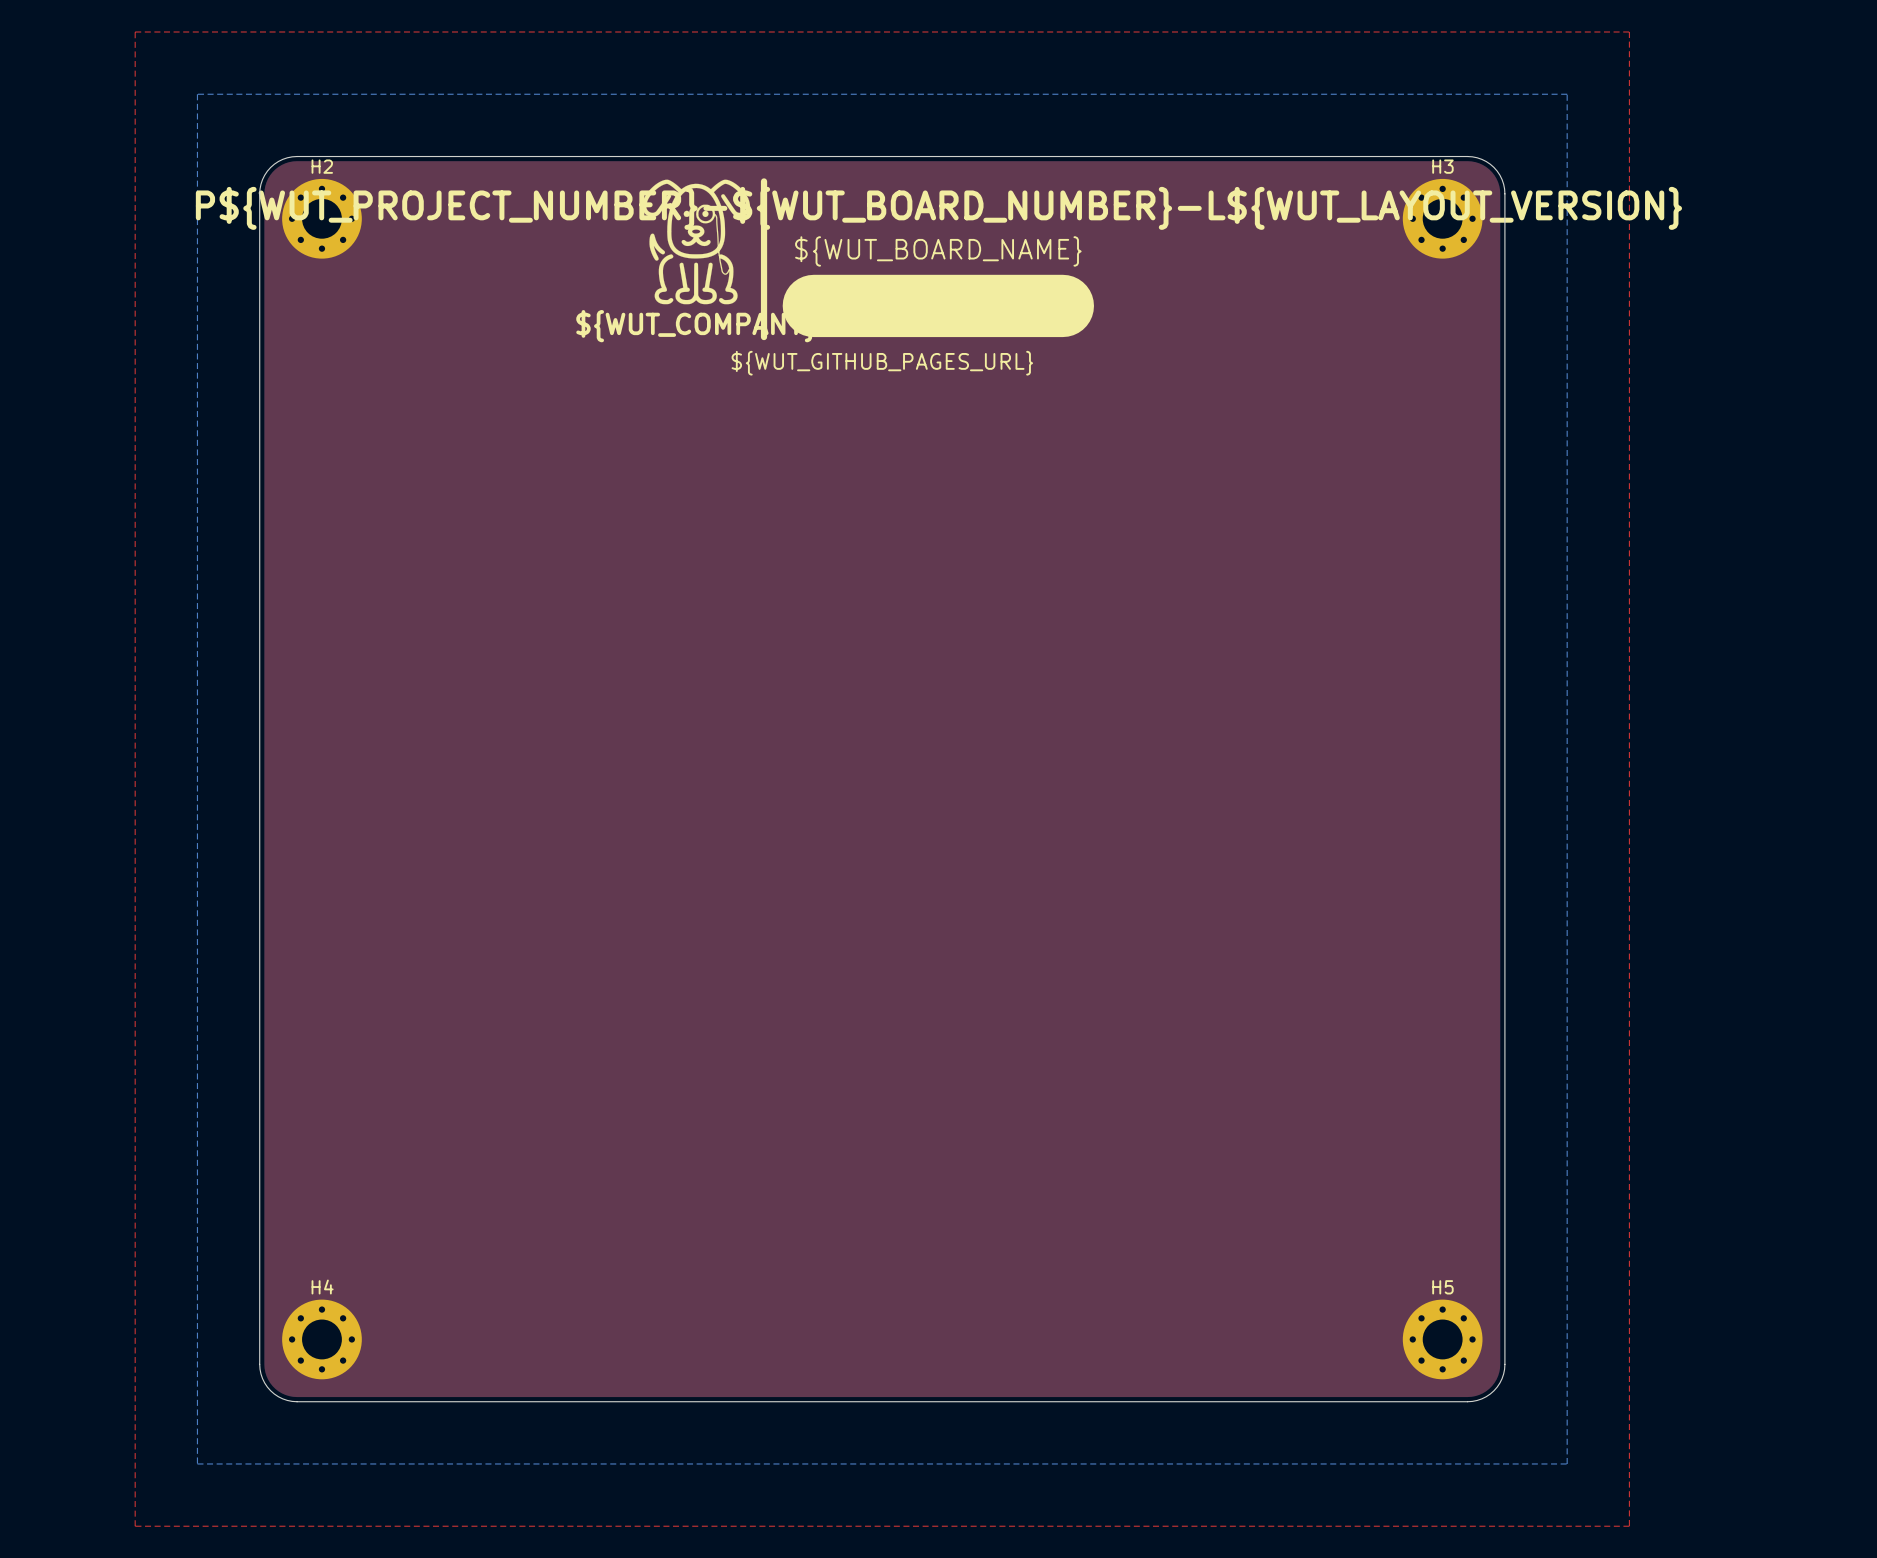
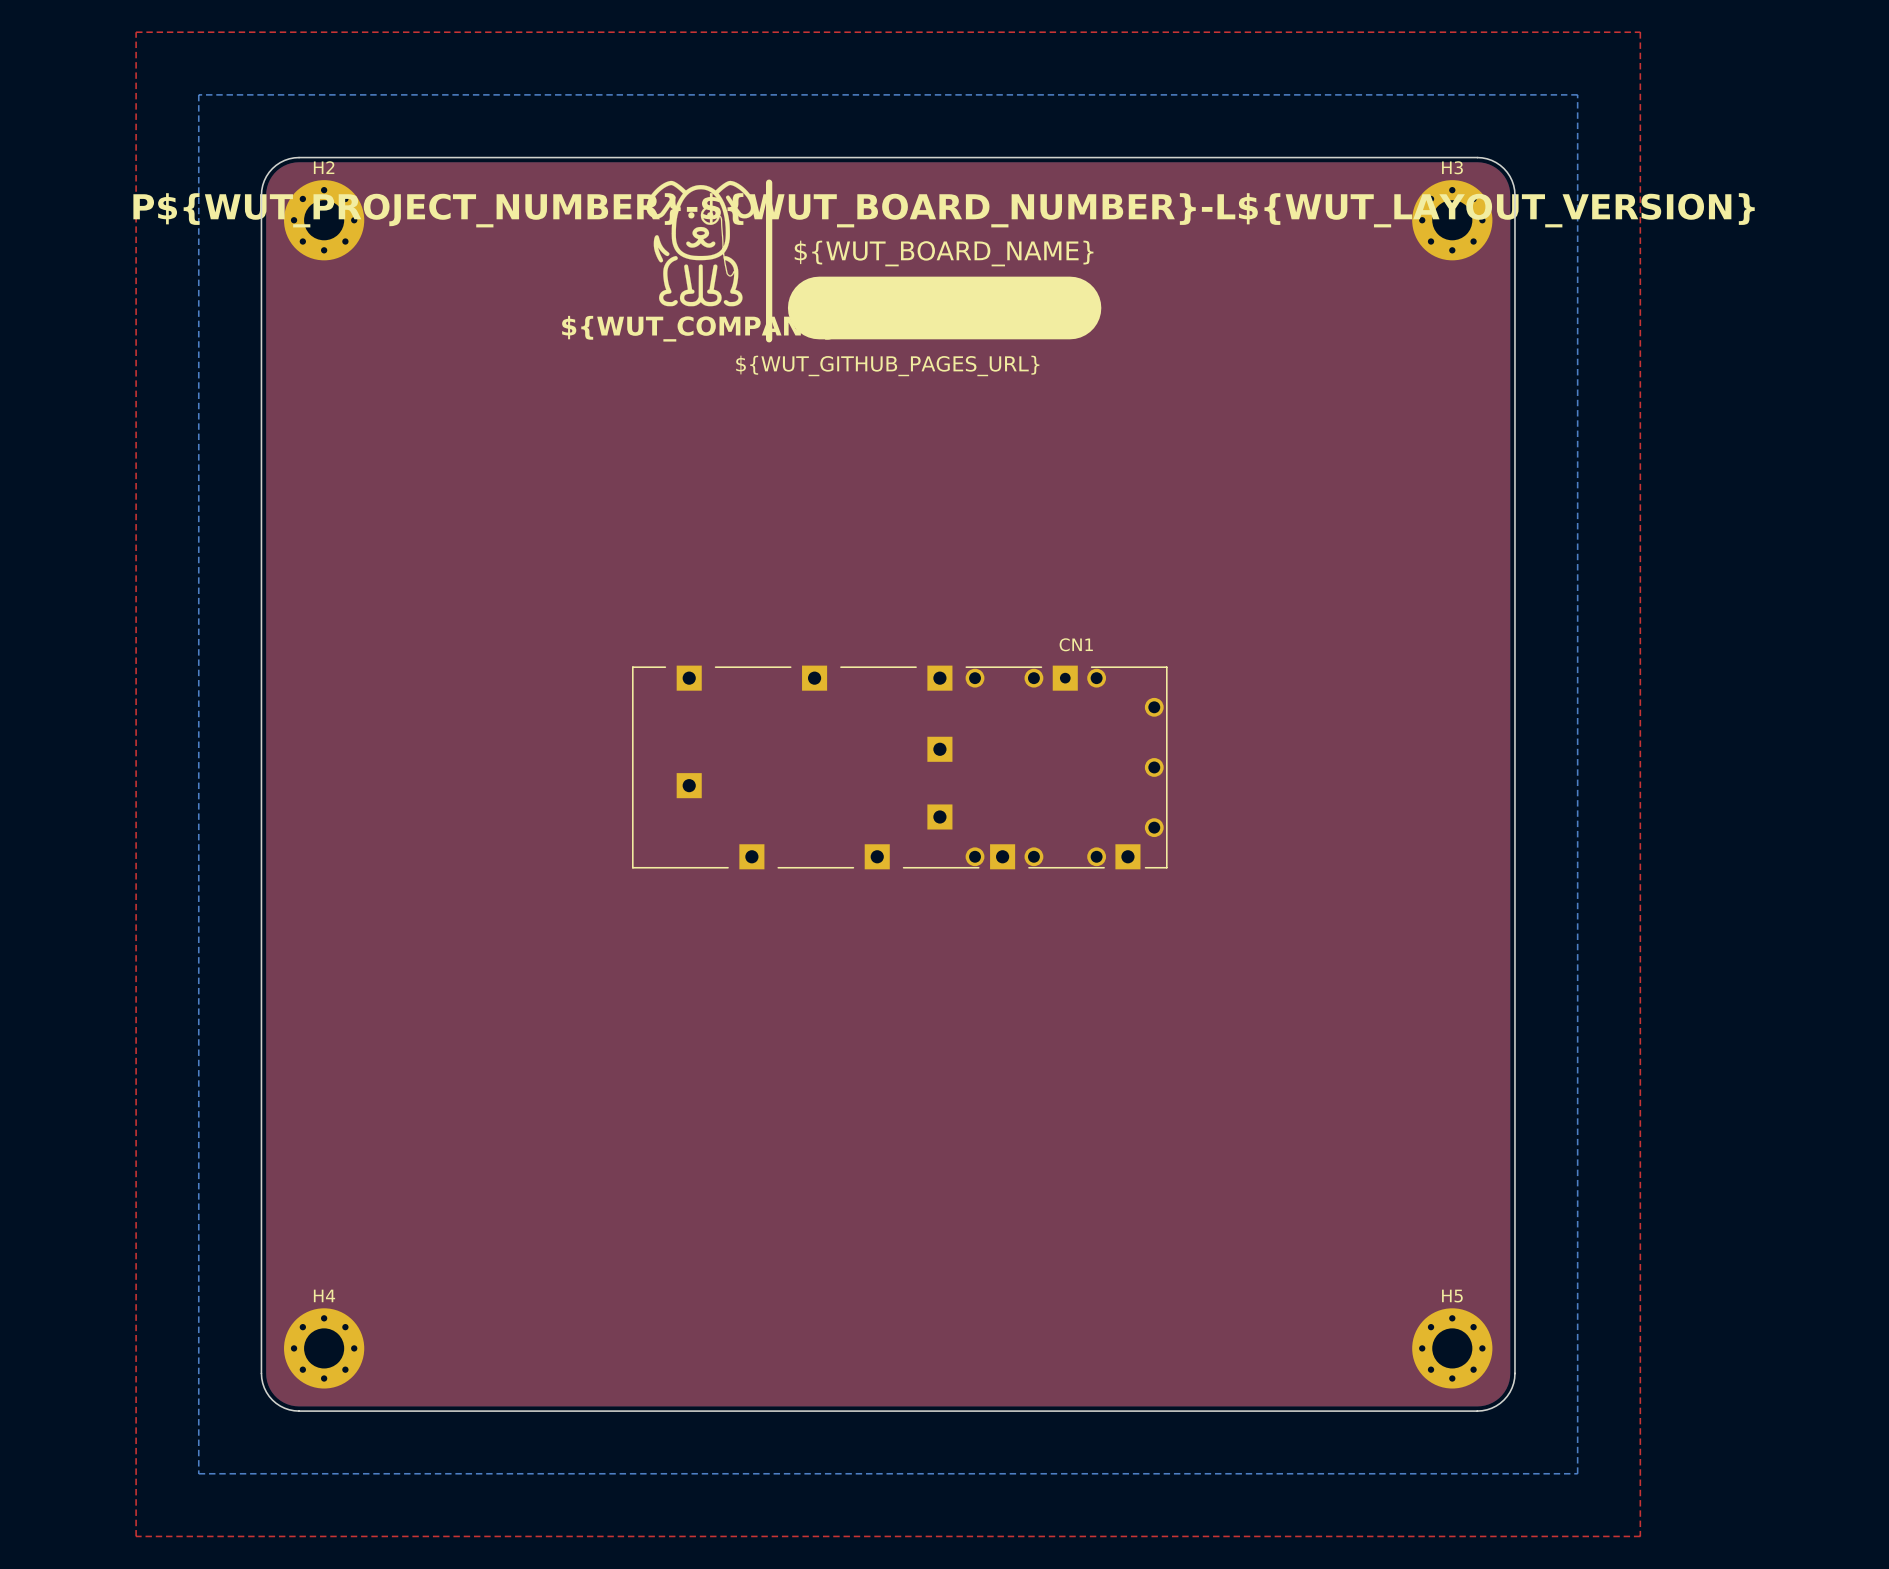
CN1: none -> (899, 767)

